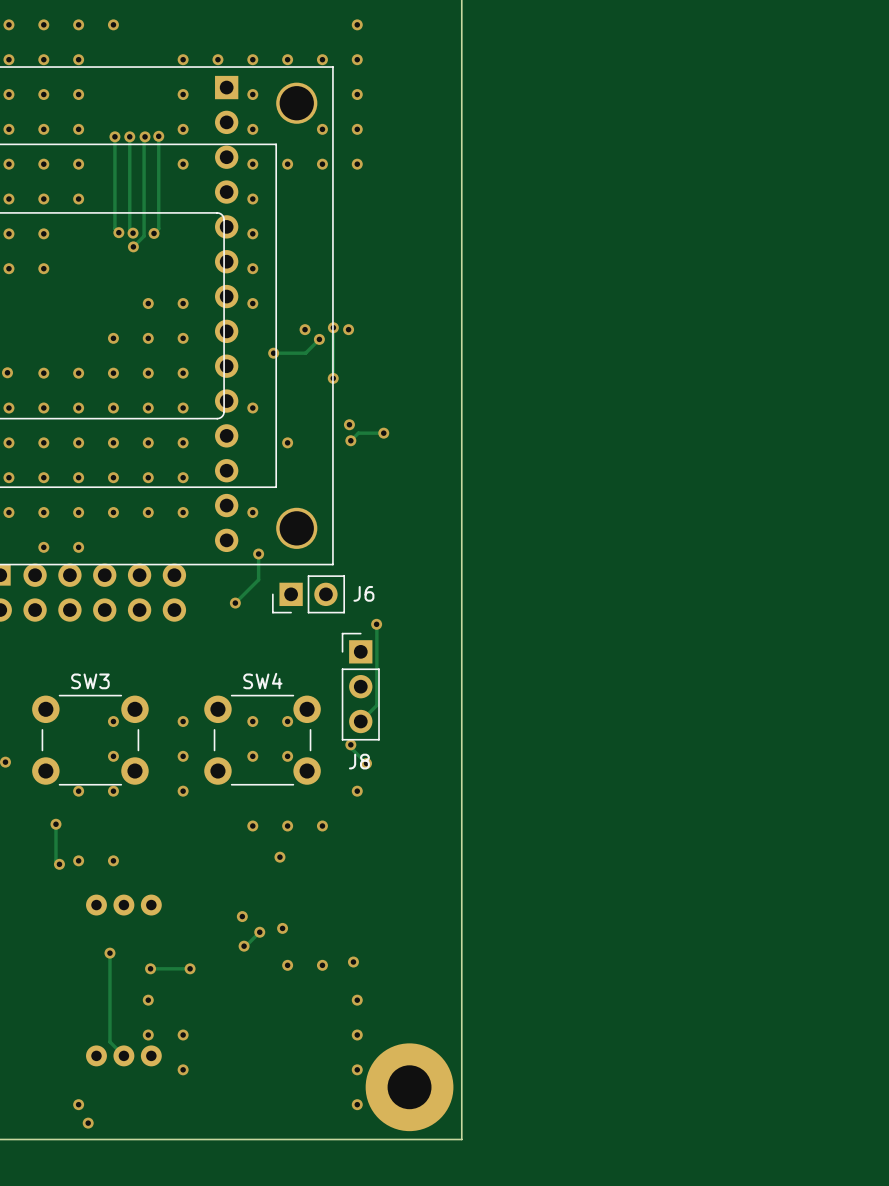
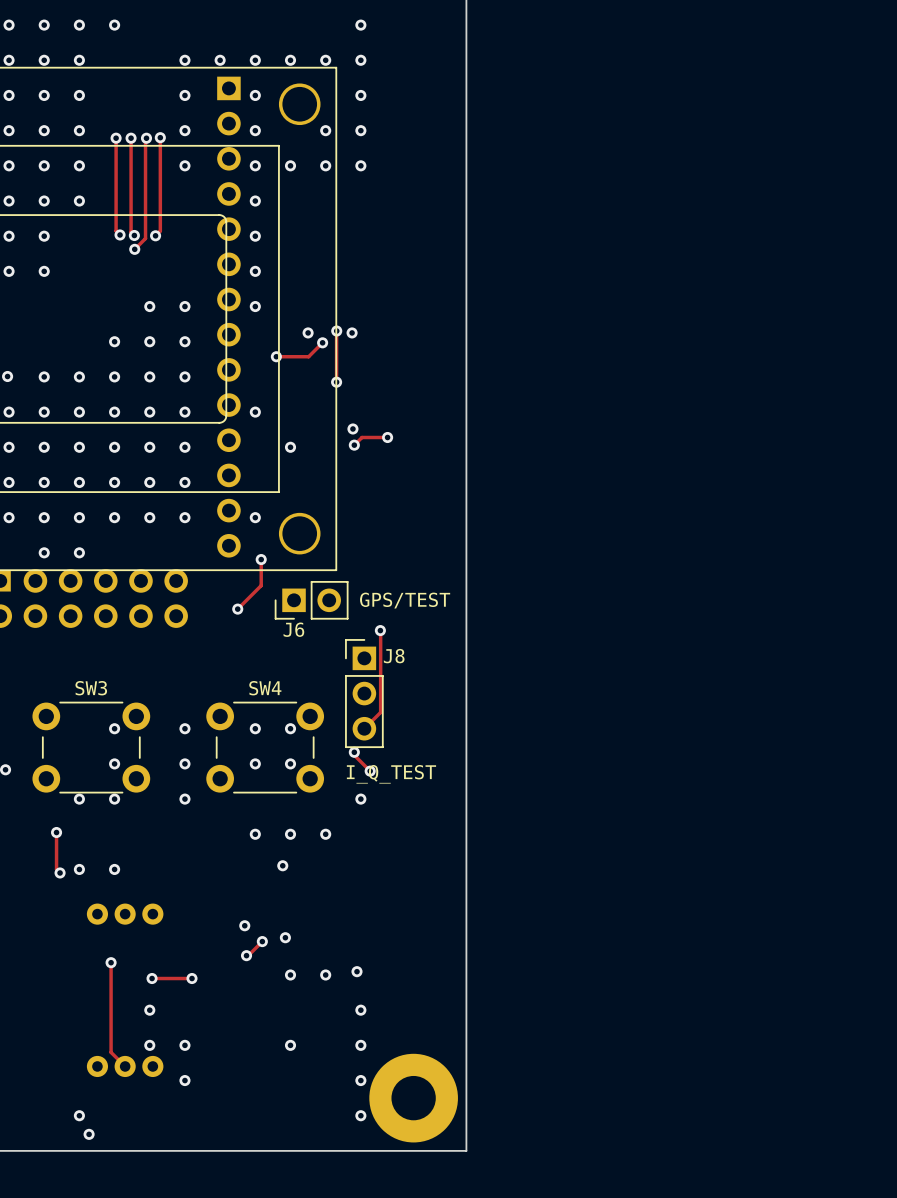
J6 name position: J6 (363, 593) -> J6 (293, 629)
text: none -> GPS/TEST (405, 600)
J8 name position: J8 (359, 761) -> J8 (394, 656)
text: none -> I_Q_TEST (391, 774)
via: none -> (290, 1045)

